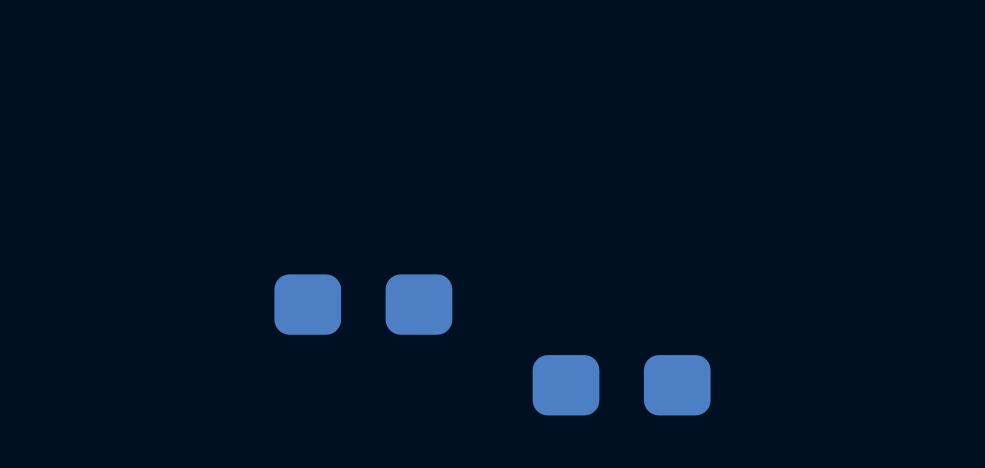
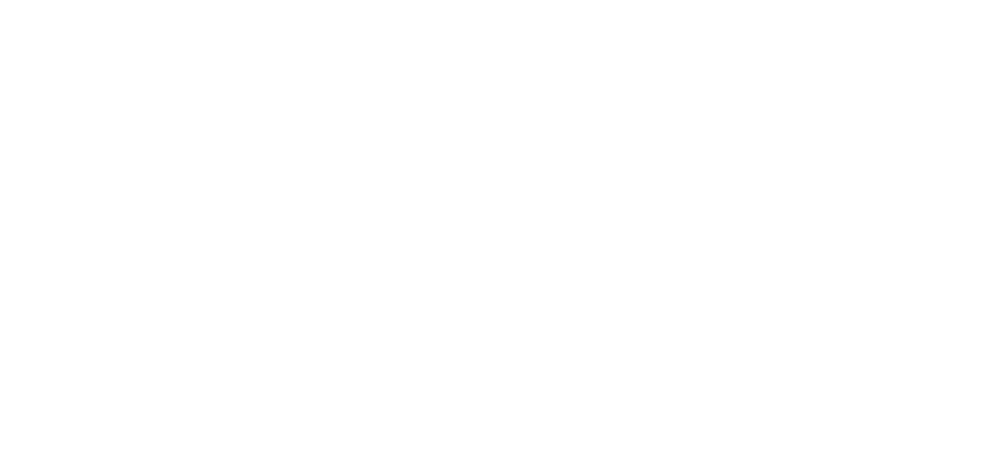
part: (363, 304) -> none
part: (621, 385) -> none

